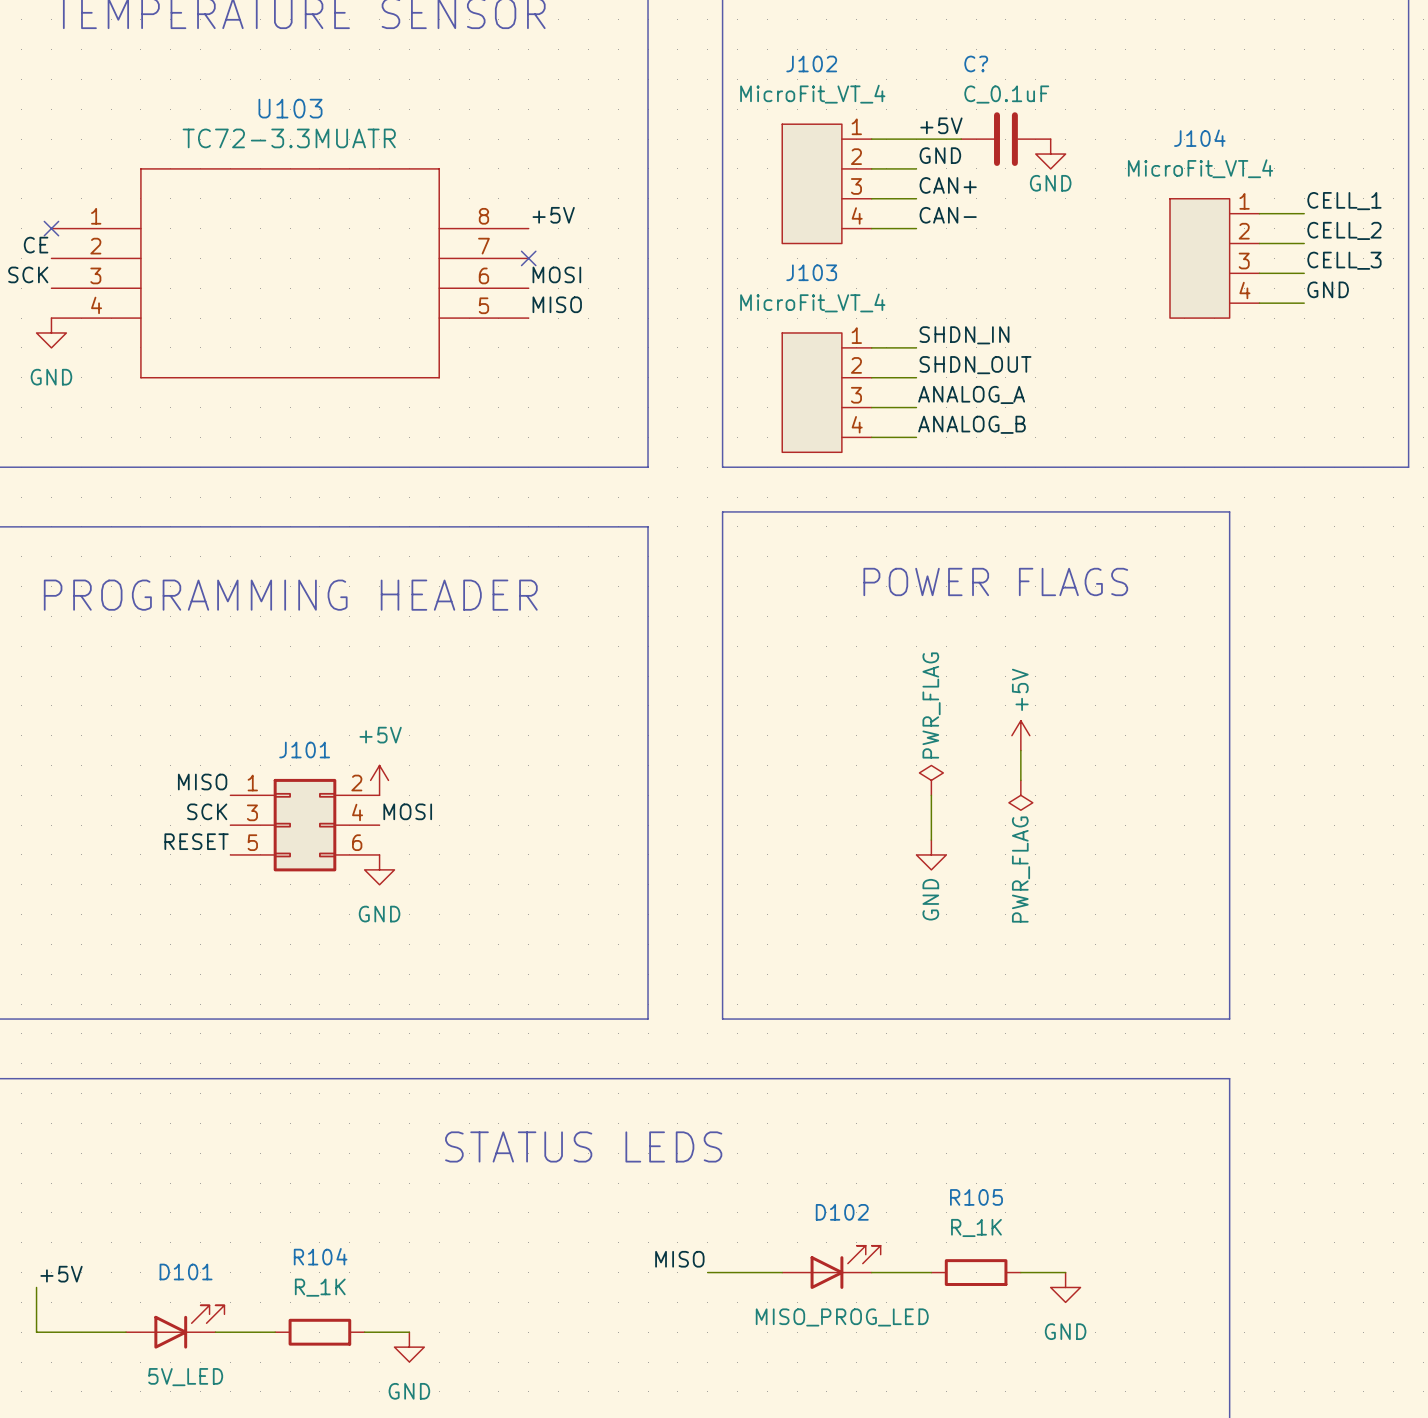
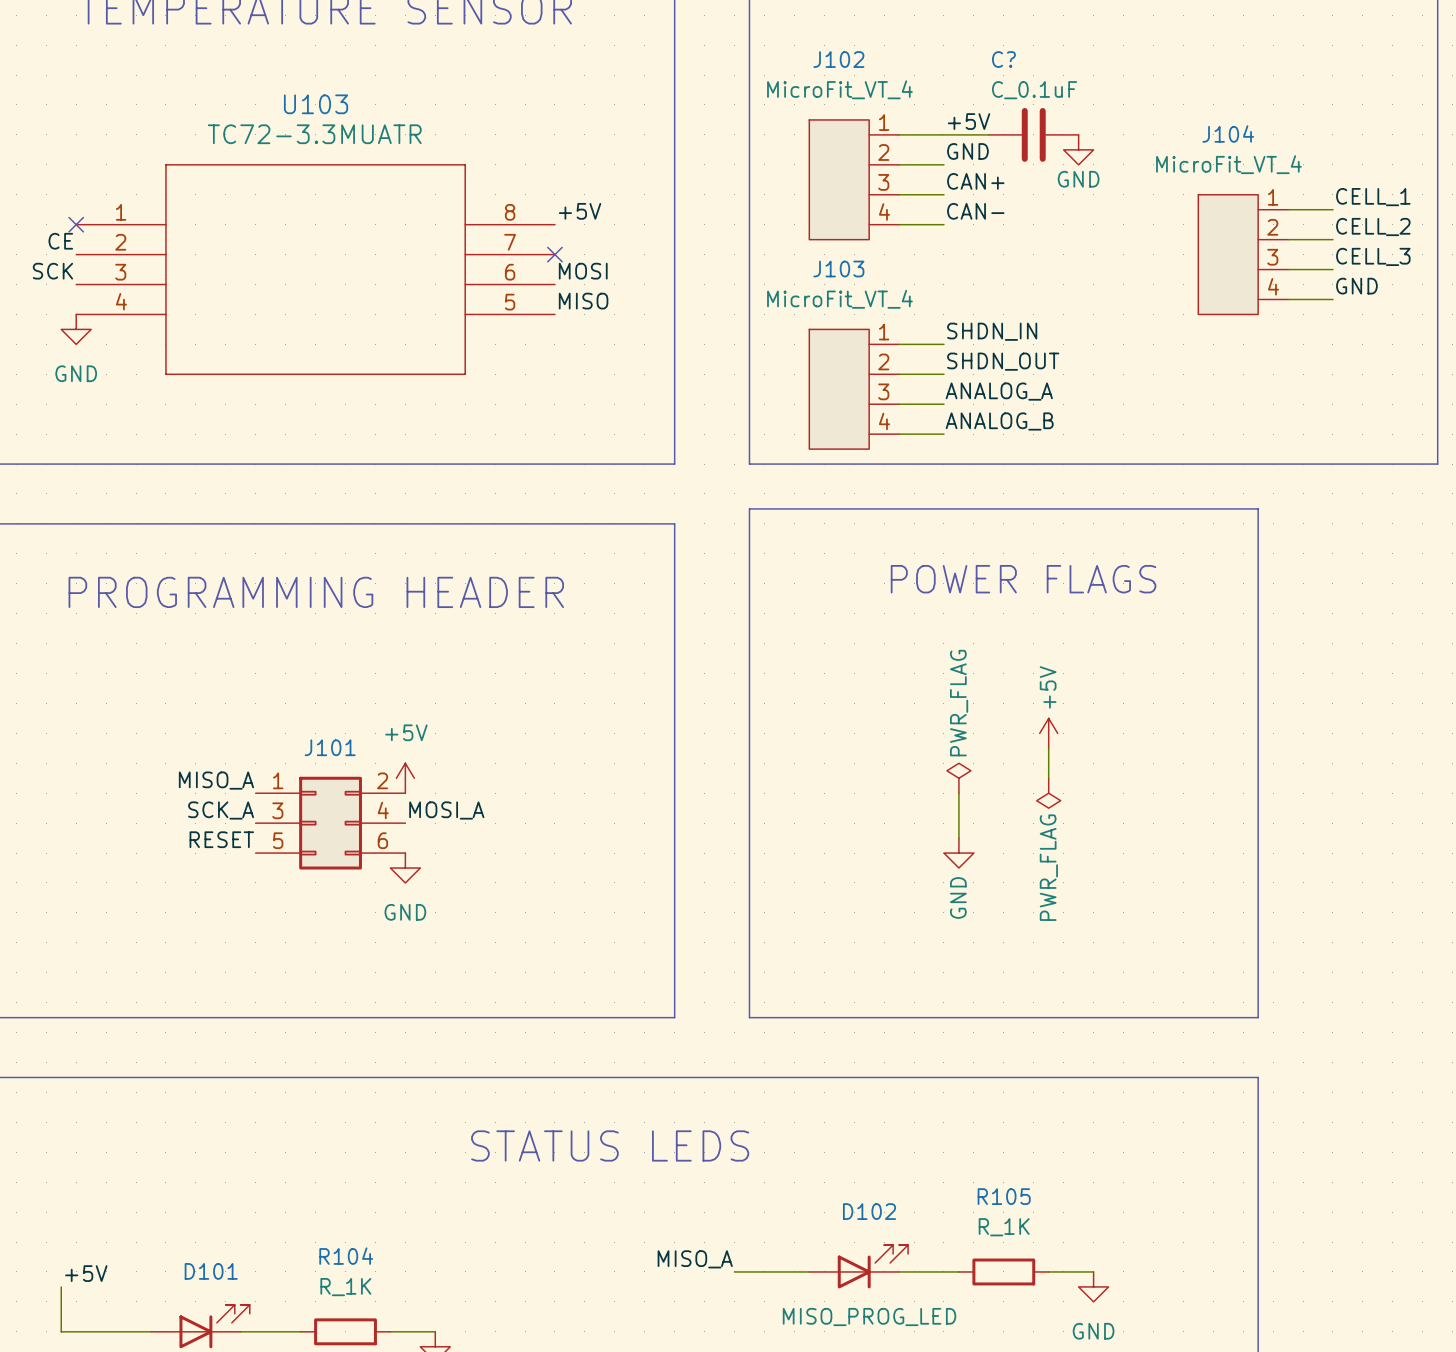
label: MISO (202, 782) -> MISO_A (216, 780)
label: SCK (207, 811) -> SCK_A (221, 810)
label: MOSI (407, 811) -> MOSI_A (446, 810)
label: MISO (679, 1259) -> MISO_A (695, 1259)

